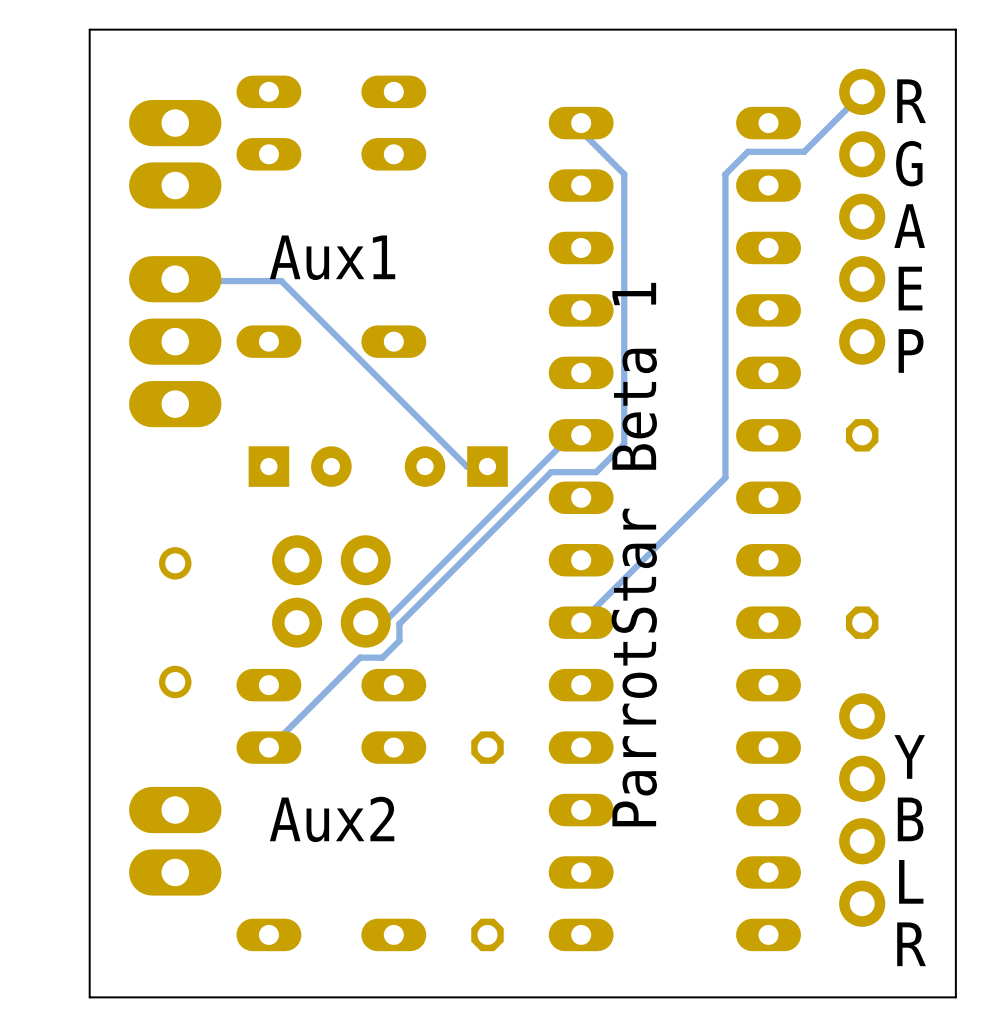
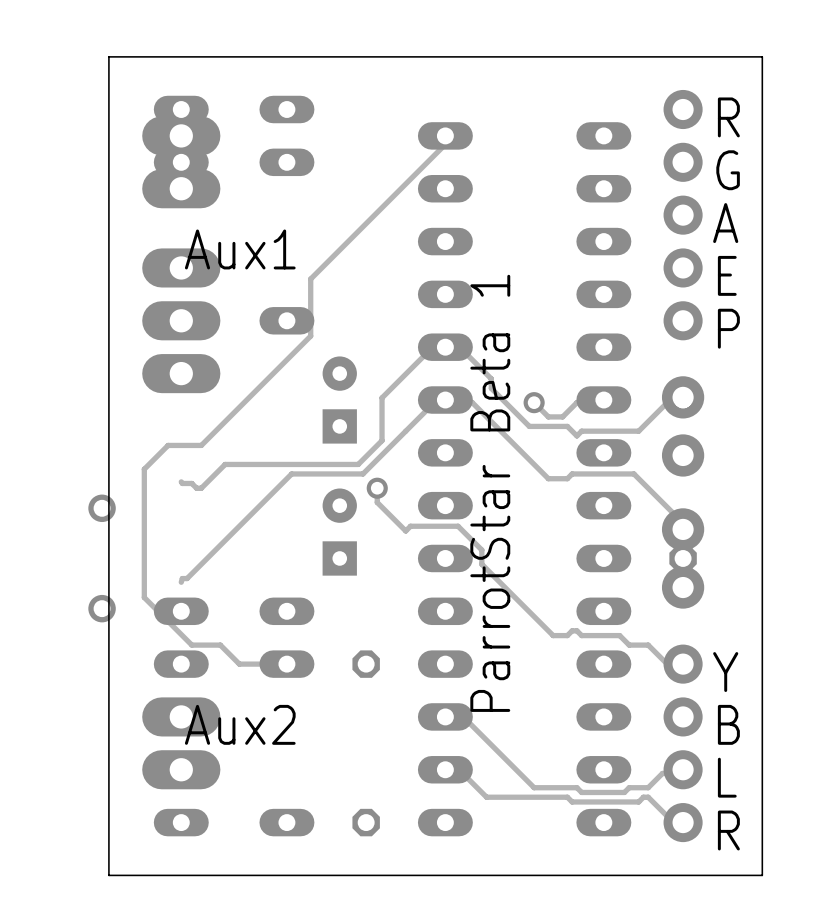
board edge: (183, 29) (89, 29) (89, 997) (183, 997) -> (108, 56) (108, 875)
track: (862, 91) (804, 151) (747, 151) (725, 174) (725, 477) (581, 622) -> none
track: (581, 123) (584, 123) (584, 134) (624, 174) (624, 444) (596, 472) (551, 472) (399, 623) (399, 640) (382, 657) (360, 657) (268, 747) -> (445, 135) (443, 145) (310, 279) (310, 336) (201, 445) (168, 445) (144, 469) (144, 597) (191, 645) (220, 645) (239, 664) (260, 664)
part position: (175, 154) -> (181, 162)
track: (175, 279) (180, 281) (281, 281) (466, 466) (487, 466) -> none
part position: (175, 341) -> (181, 320)
track: none -> (683, 397) (671, 397) (638, 431) (581, 431) (576, 435) (567, 426) (529, 426) (491, 388) (491, 378) (462, 350) (448, 350) (445, 347) (443, 350) (429, 350) (382, 397) (382, 440) (358, 464) (225, 464) (201, 488) (196, 488) (191, 483) (181, 481)
track: none -> (445, 400) (448, 402) (472, 402) (548, 478) (567, 478) (572, 473) (633, 473) (686, 526) (683, 529)
track: none -> (603, 400) (600, 402) (576, 402) (562, 416) (548, 416) (534, 402)
via: none -> (534, 402)
part: (300, 466) -> none
part rotation: 0° (456, 466) -> 90° clockwise (339, 400)
part: none -> (683, 426)
track: (483, 522) (388, 618) (365, 618) (365, 622) -> (362, 473) (291, 473) (187, 578) (182, 578) (181, 582)
track: none -> (377, 488) (377, 502) (405, 531) (410, 526) (458, 526) (481, 550) (481, 564) (553, 635) (567, 635) (572, 630) (576, 630) (581, 635) (619, 635) (629, 645) (648, 645) (667, 664) (683, 664)
via: none -> (377, 488)
part: (331, 560) -> none
part: none -> (339, 532)
part: (331, 622) -> none
part: none -> (683, 558)
track: none -> (445, 716) (448, 721) (467, 721) (534, 787) (576, 787) (581, 792) (624, 792) (629, 787) (648, 787) (662, 773) (681, 773) (683, 769)
part position: (862, 810) -> (683, 743)
part position: (175, 841) -> (181, 743)
track: none -> (445, 769) (448, 773) (462, 773) (486, 797) (567, 797) (572, 801) (638, 801) (643, 797) (648, 797) (671, 820) (683, 822)

